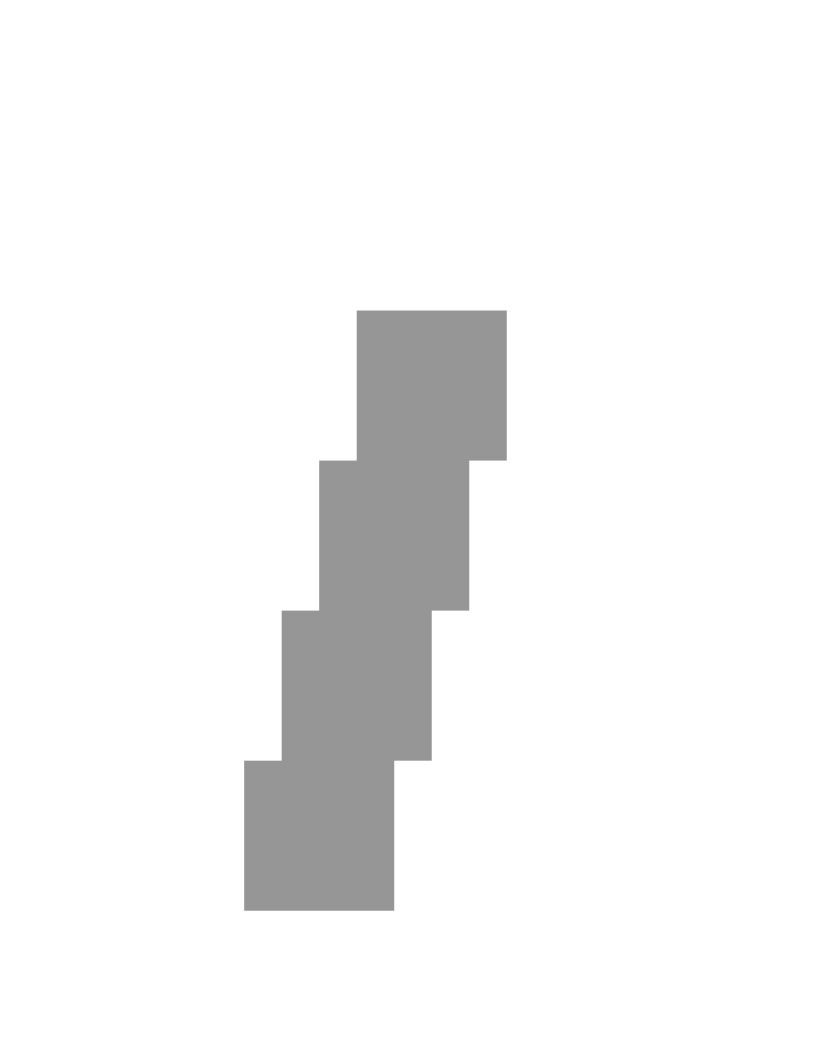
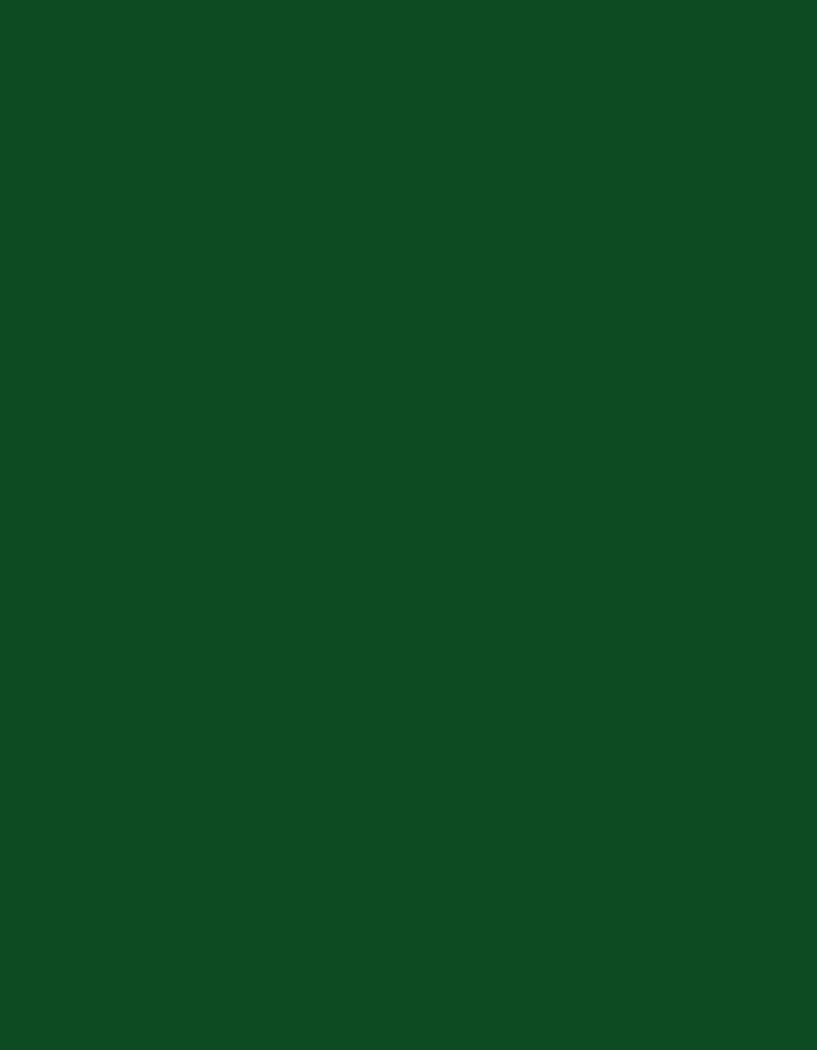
part: (431, 385) -> none
part: (394, 535) -> none
part: (356, 685) -> none
part: (319, 835) -> none

